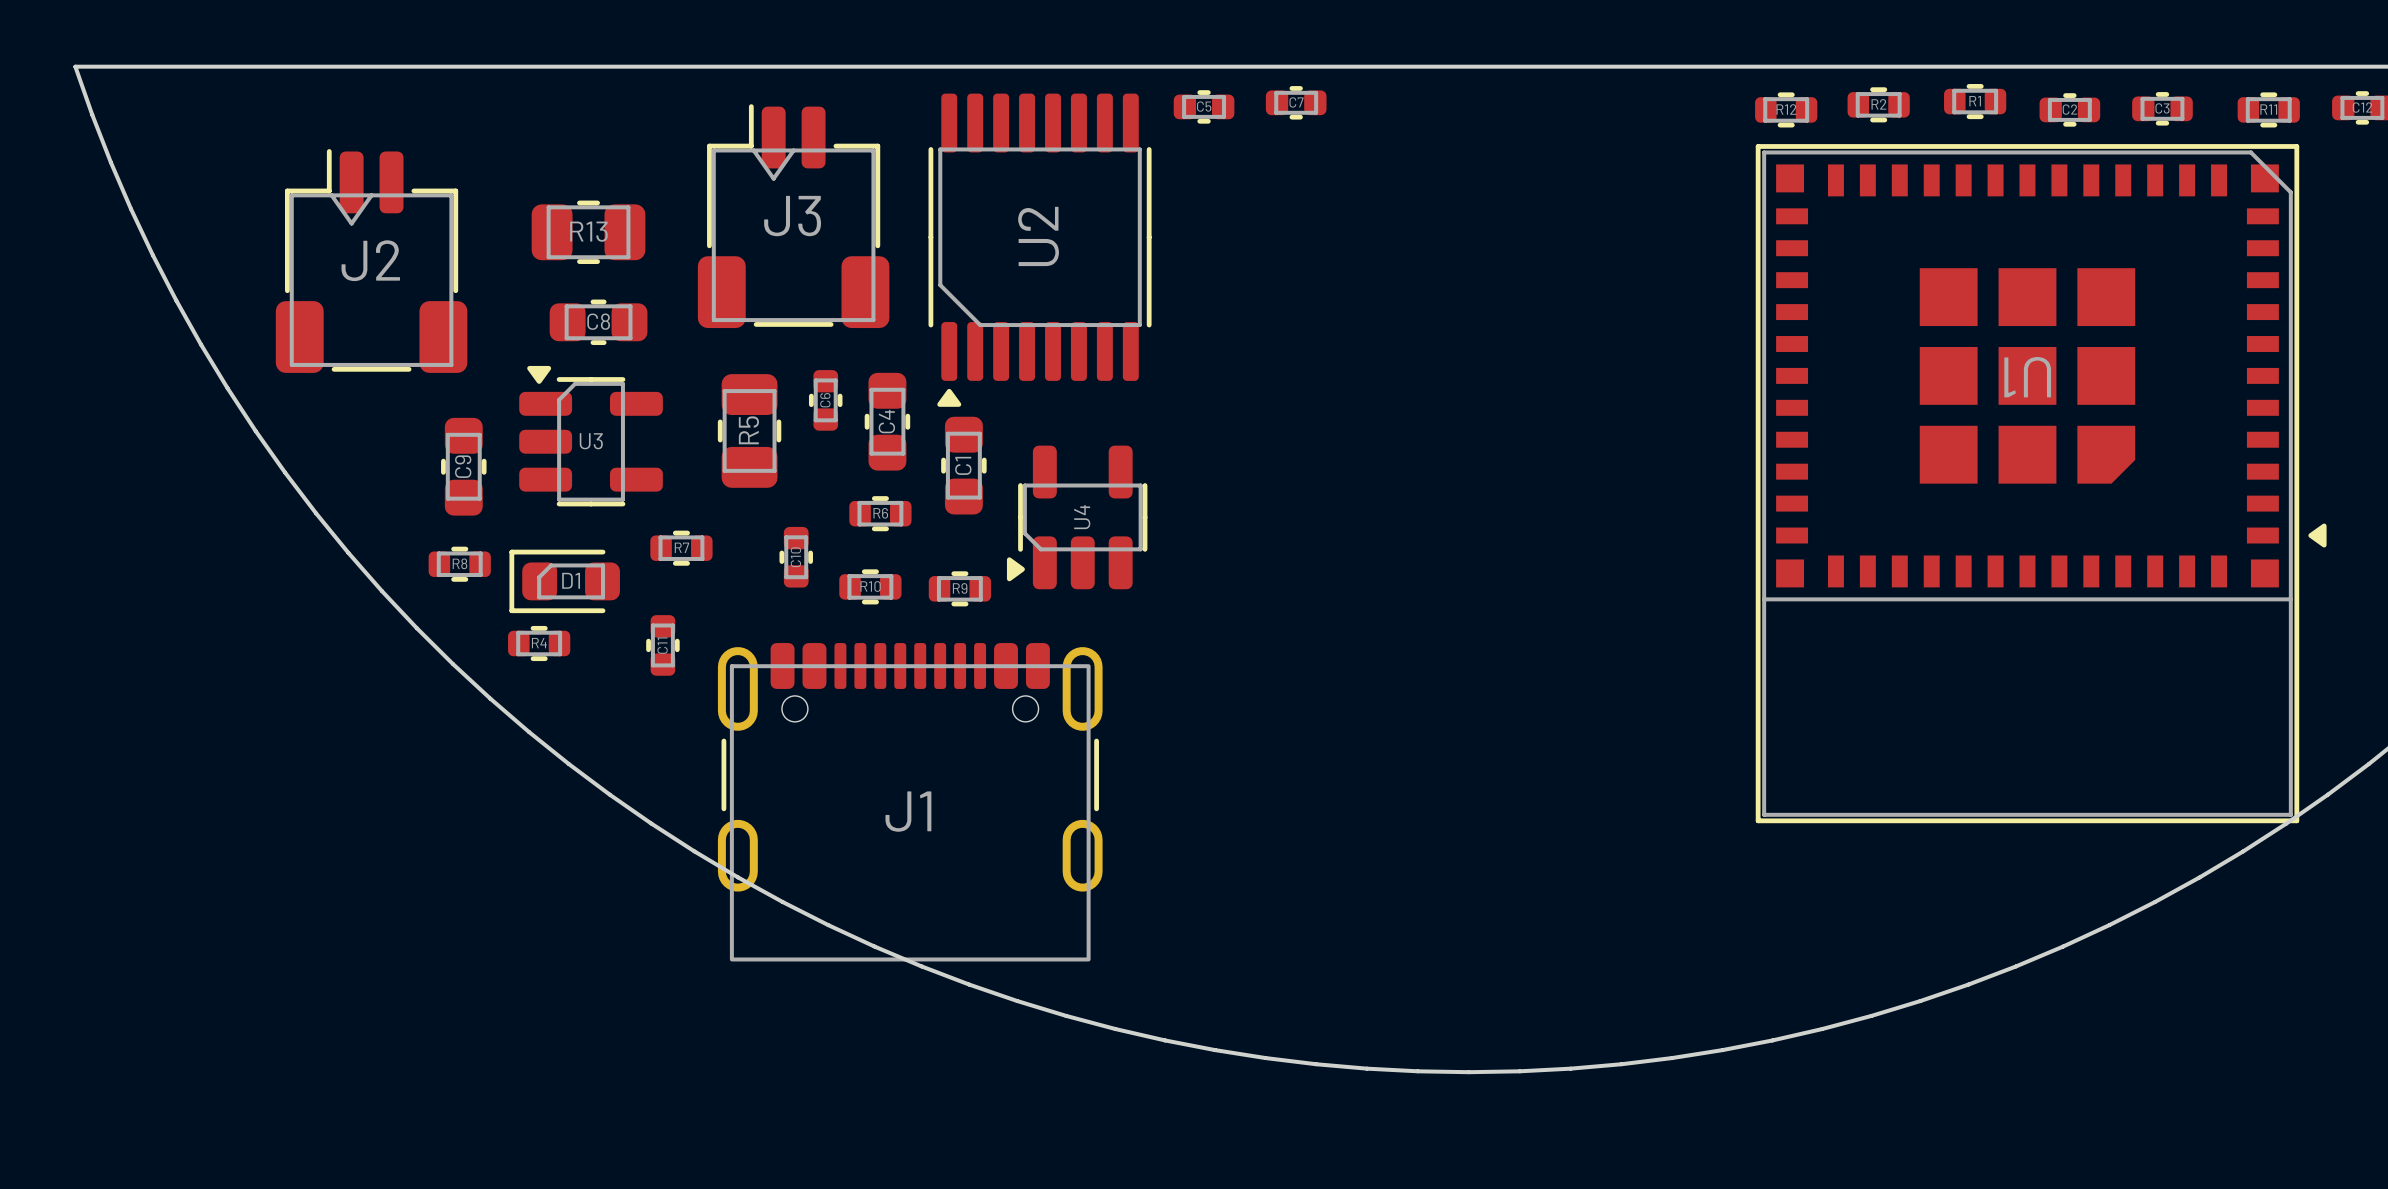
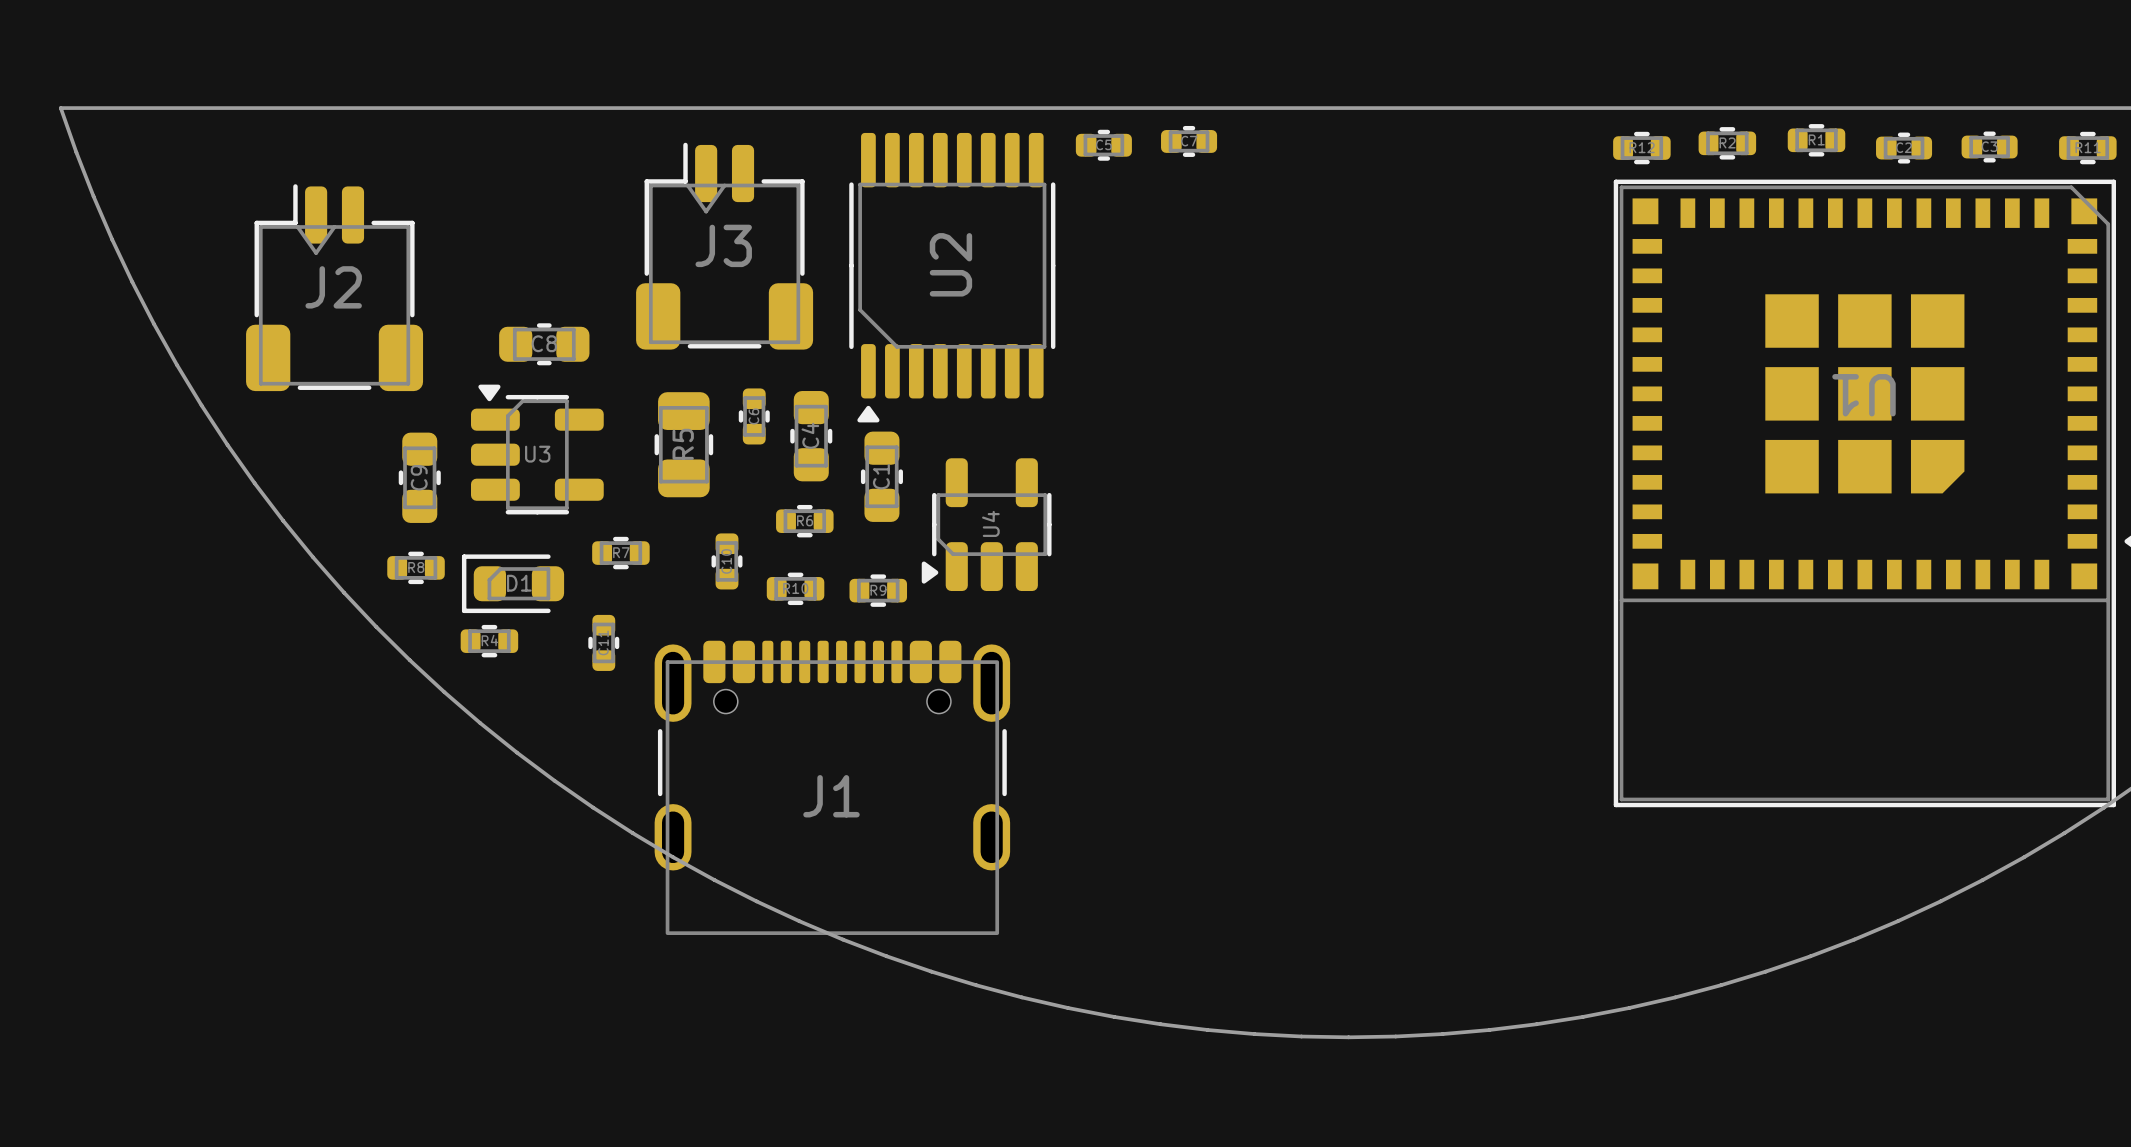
R13: (588, 232) -> none

